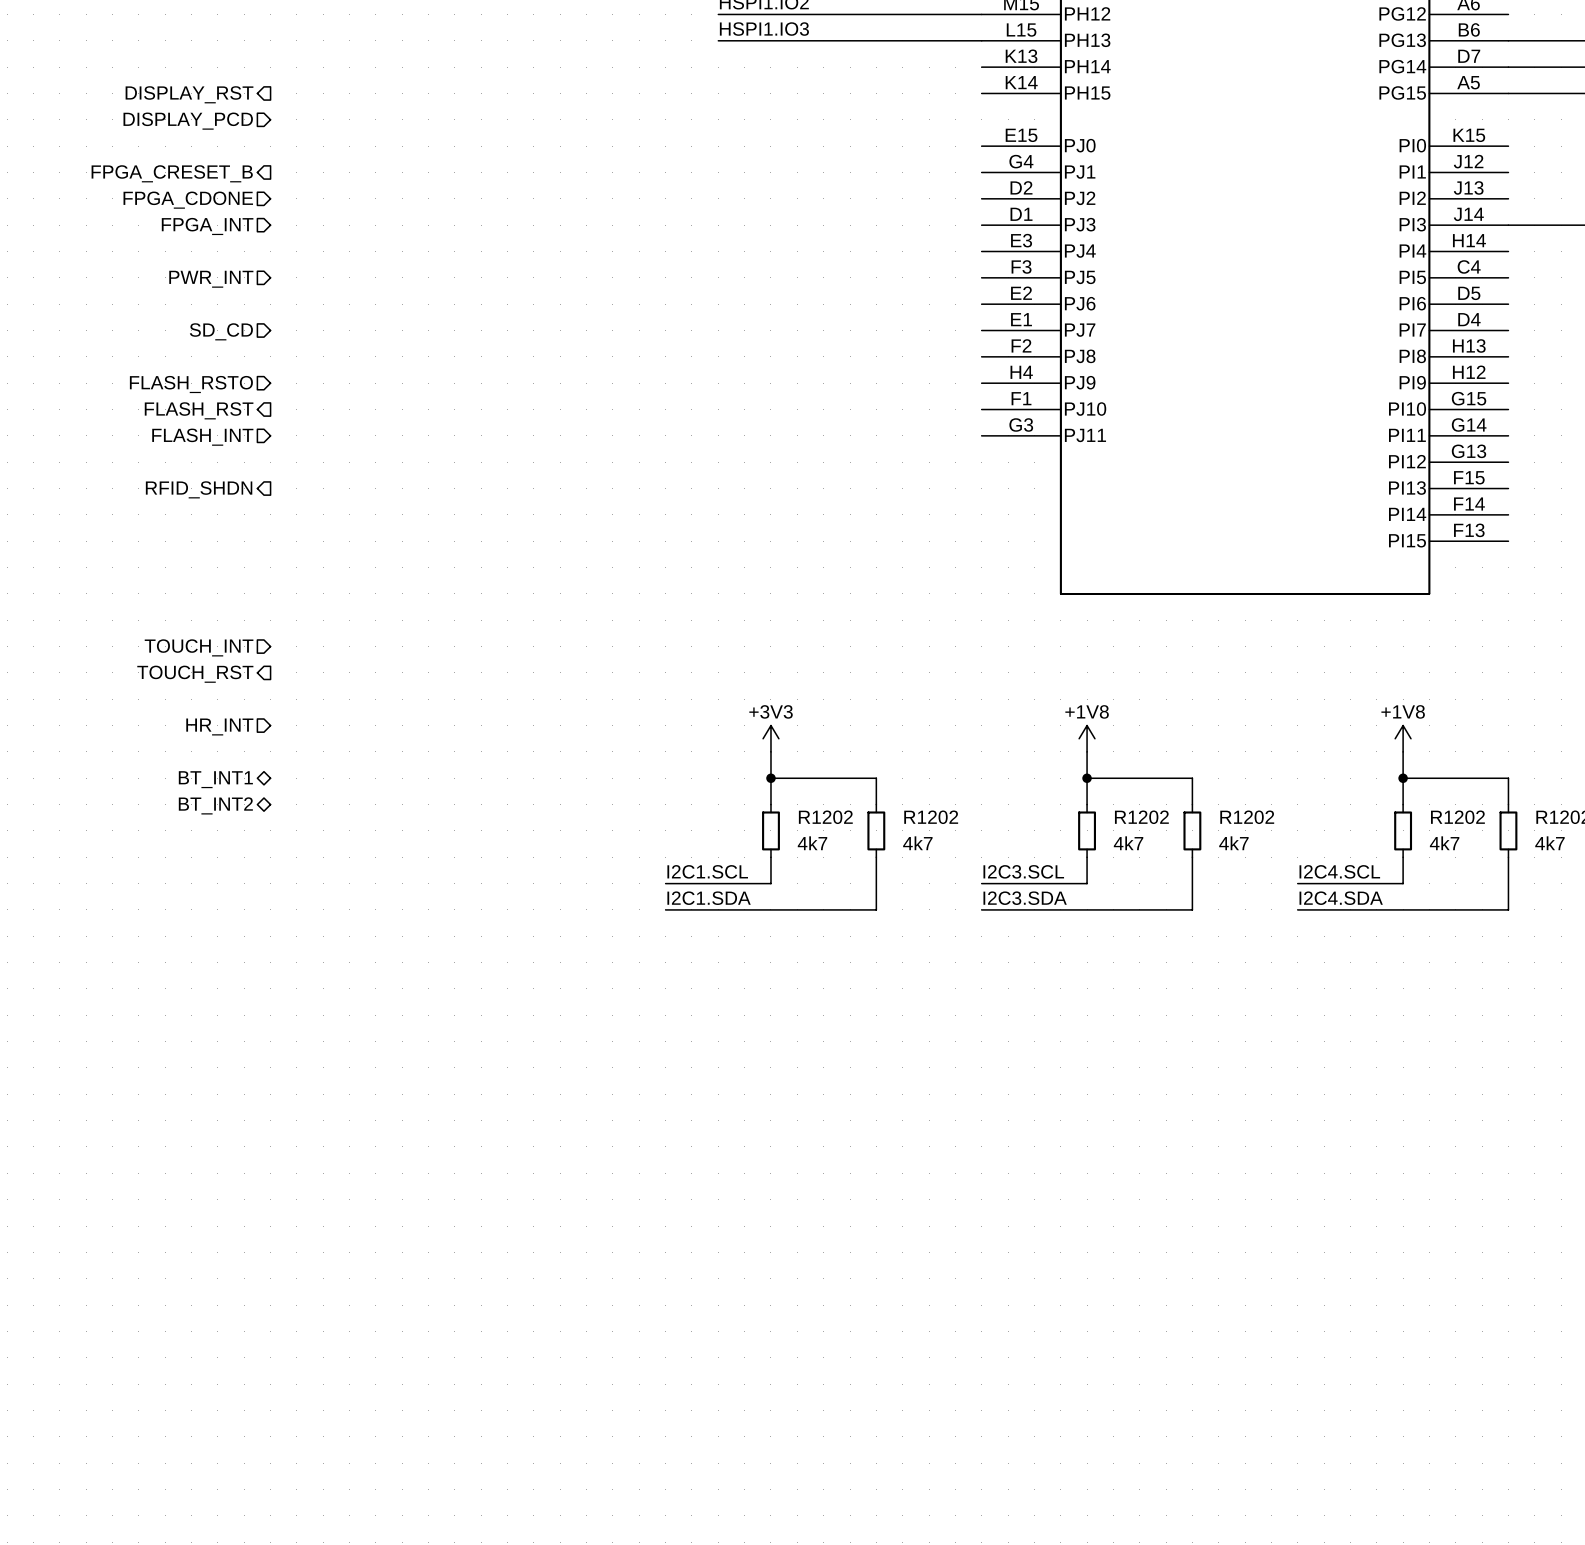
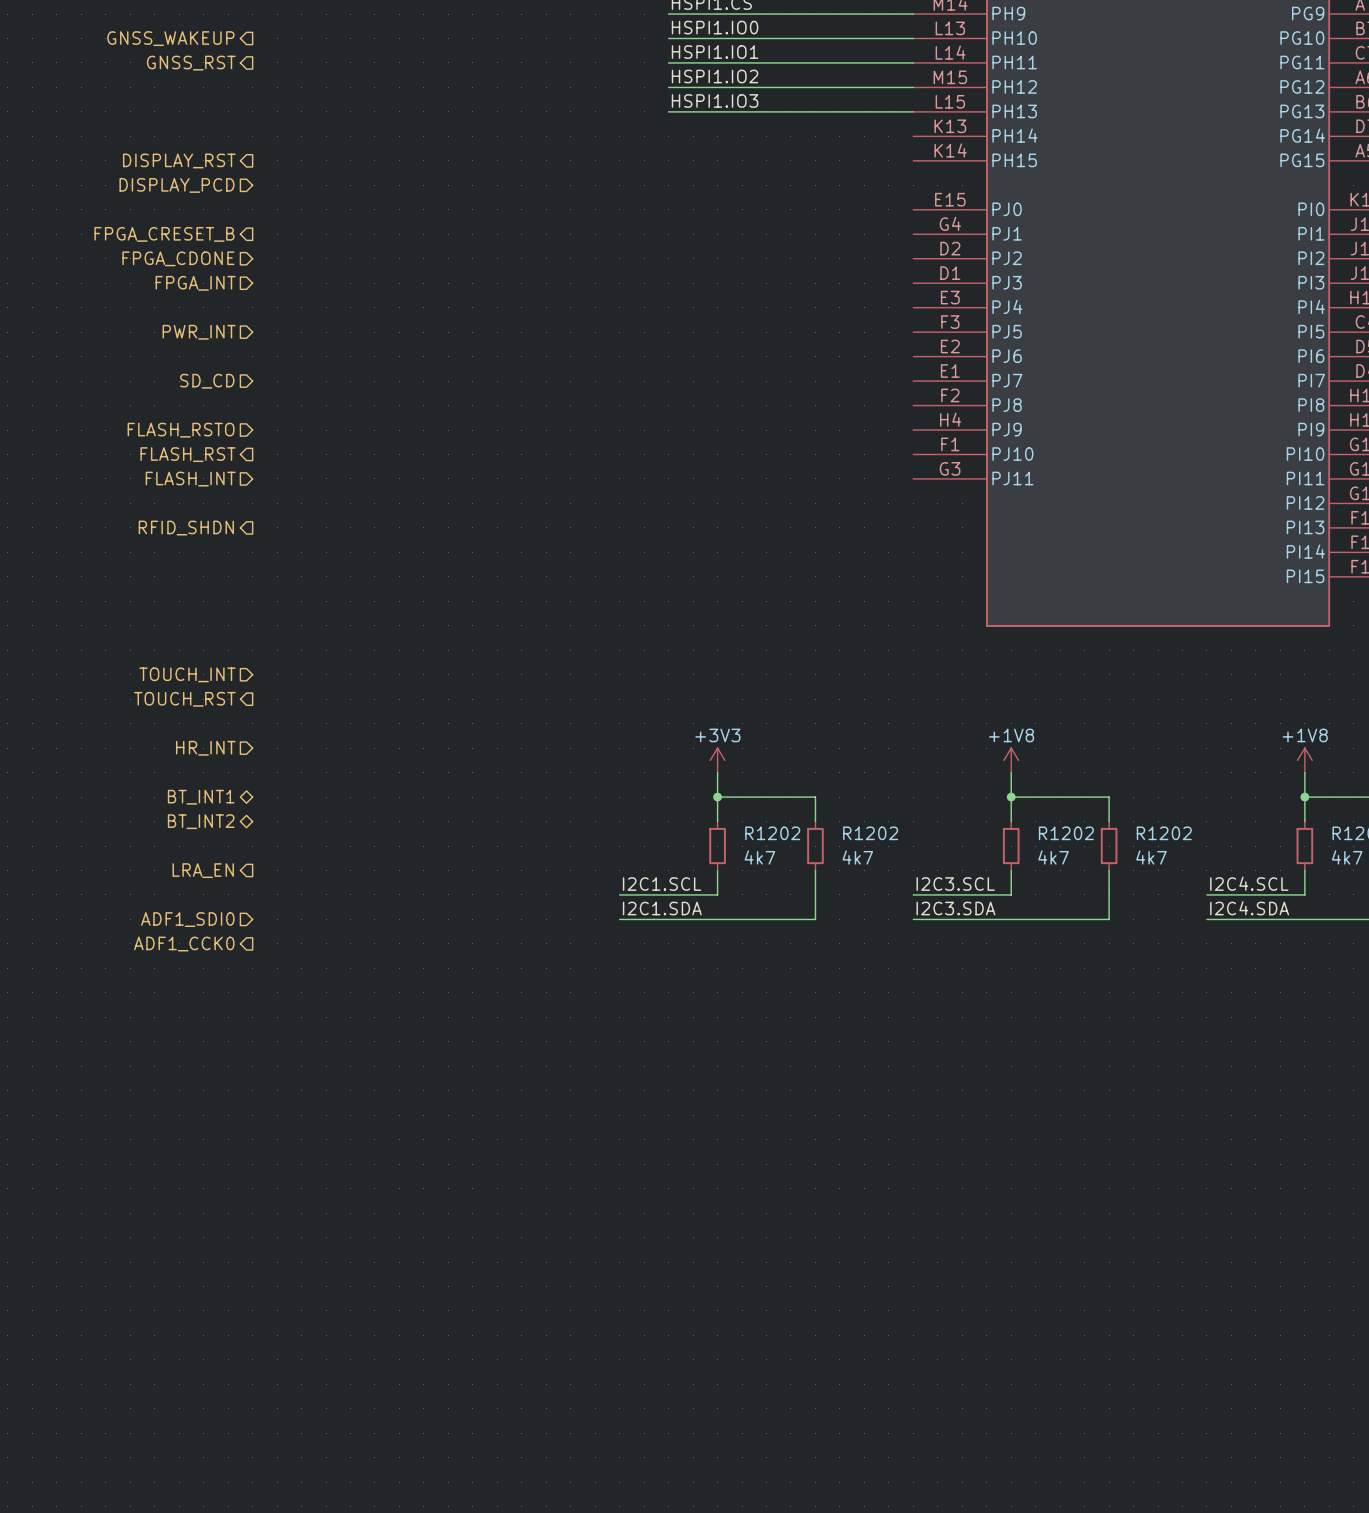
hierarchical label: none -> LRA_EN (203, 870)
hierarchical label: none -> ADF1_SDI0 (187, 919)
hierarchical label: none -> ADF1_CCK0 (184, 944)

